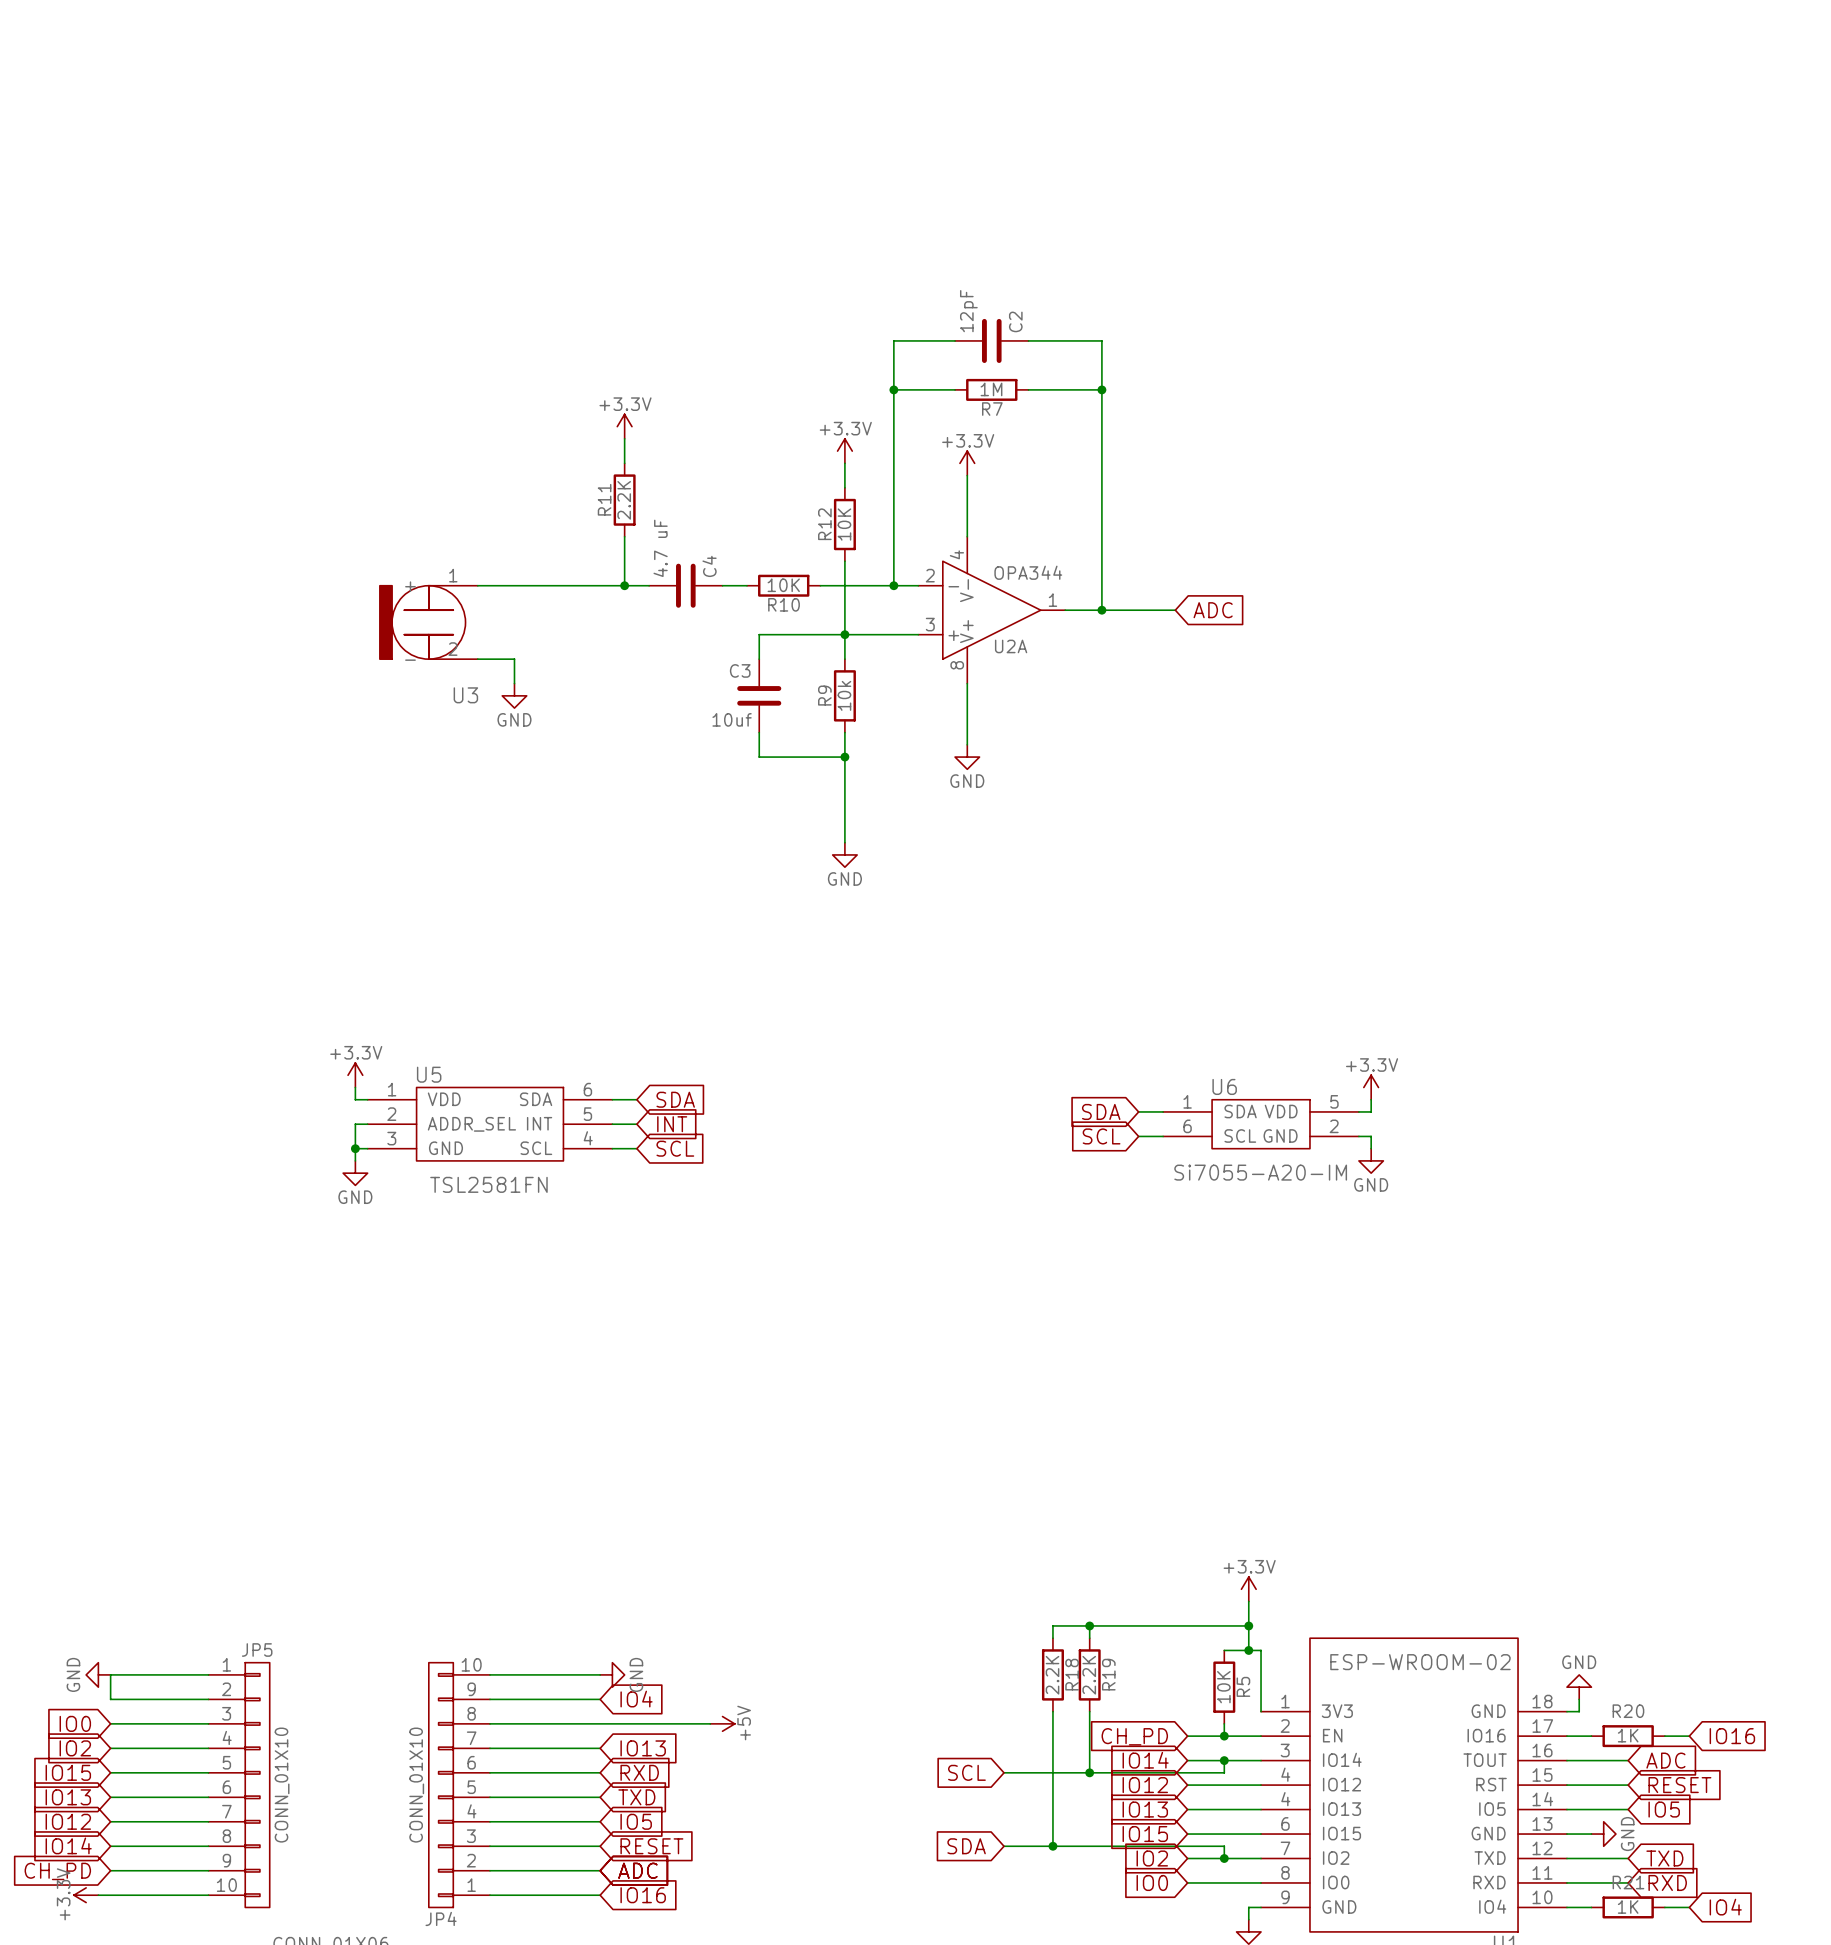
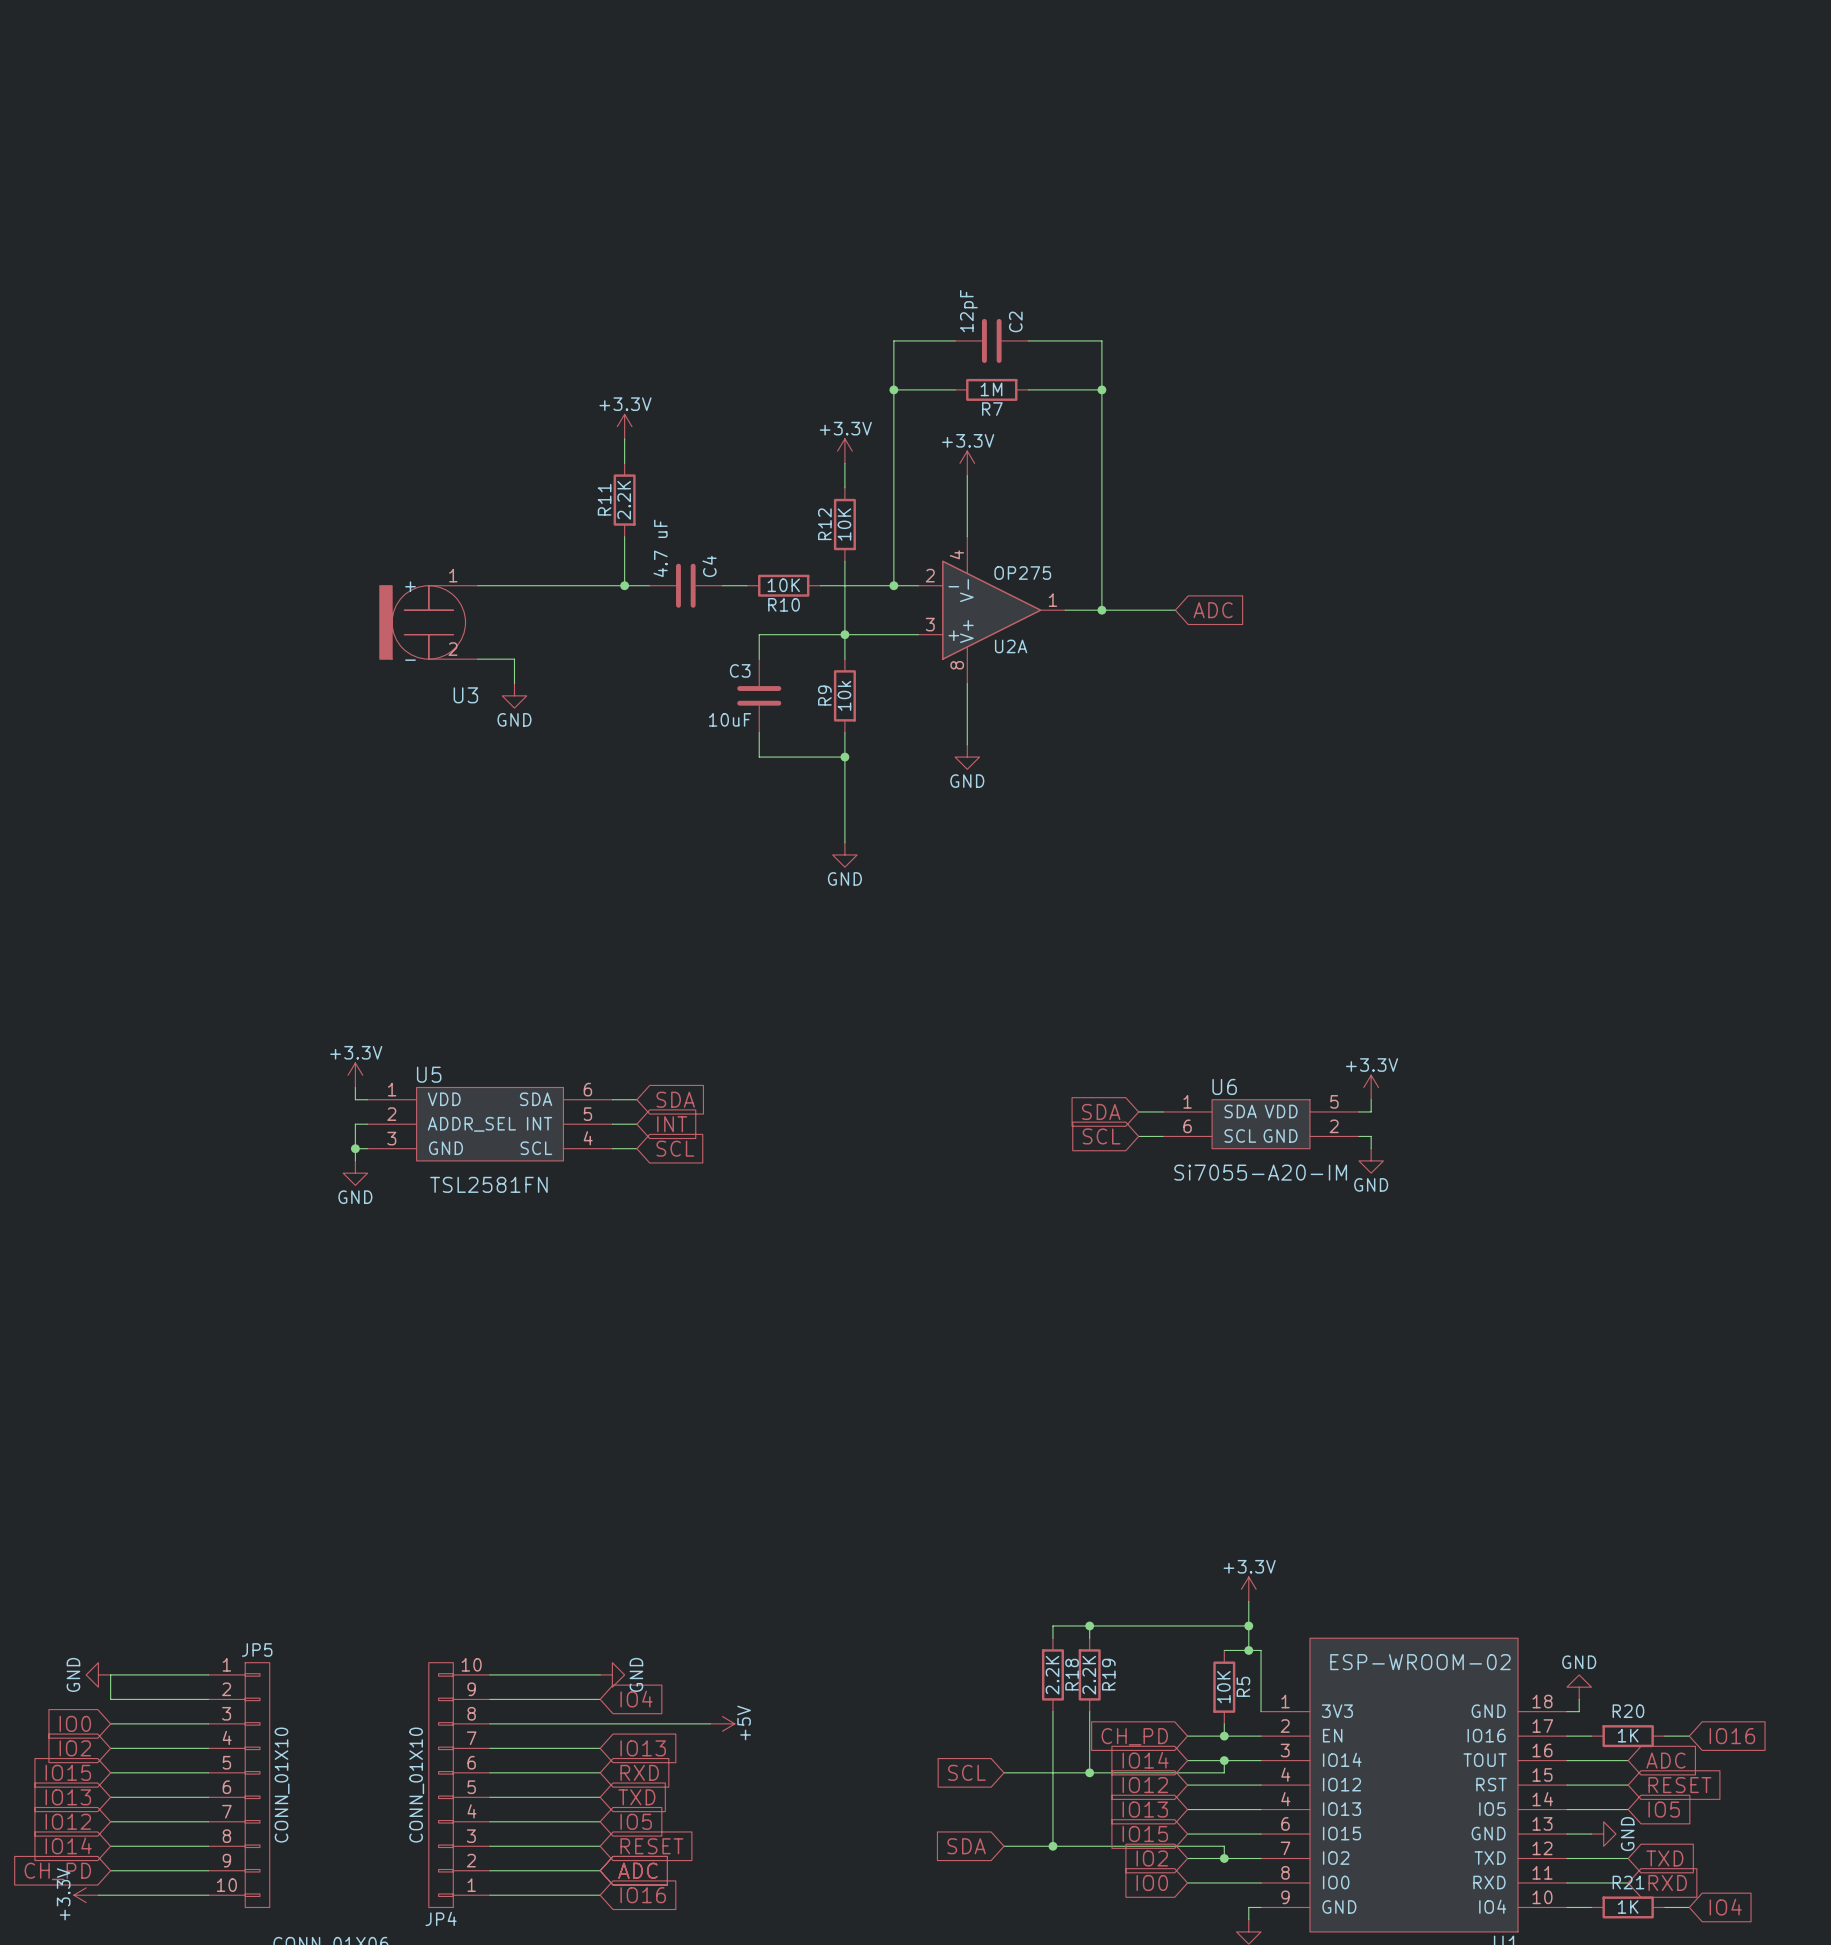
U2A value: OPA344 (1028, 572) -> OP275 (1022, 573)
C3 value: 10uf (732, 719) -> 10uF (730, 719)

